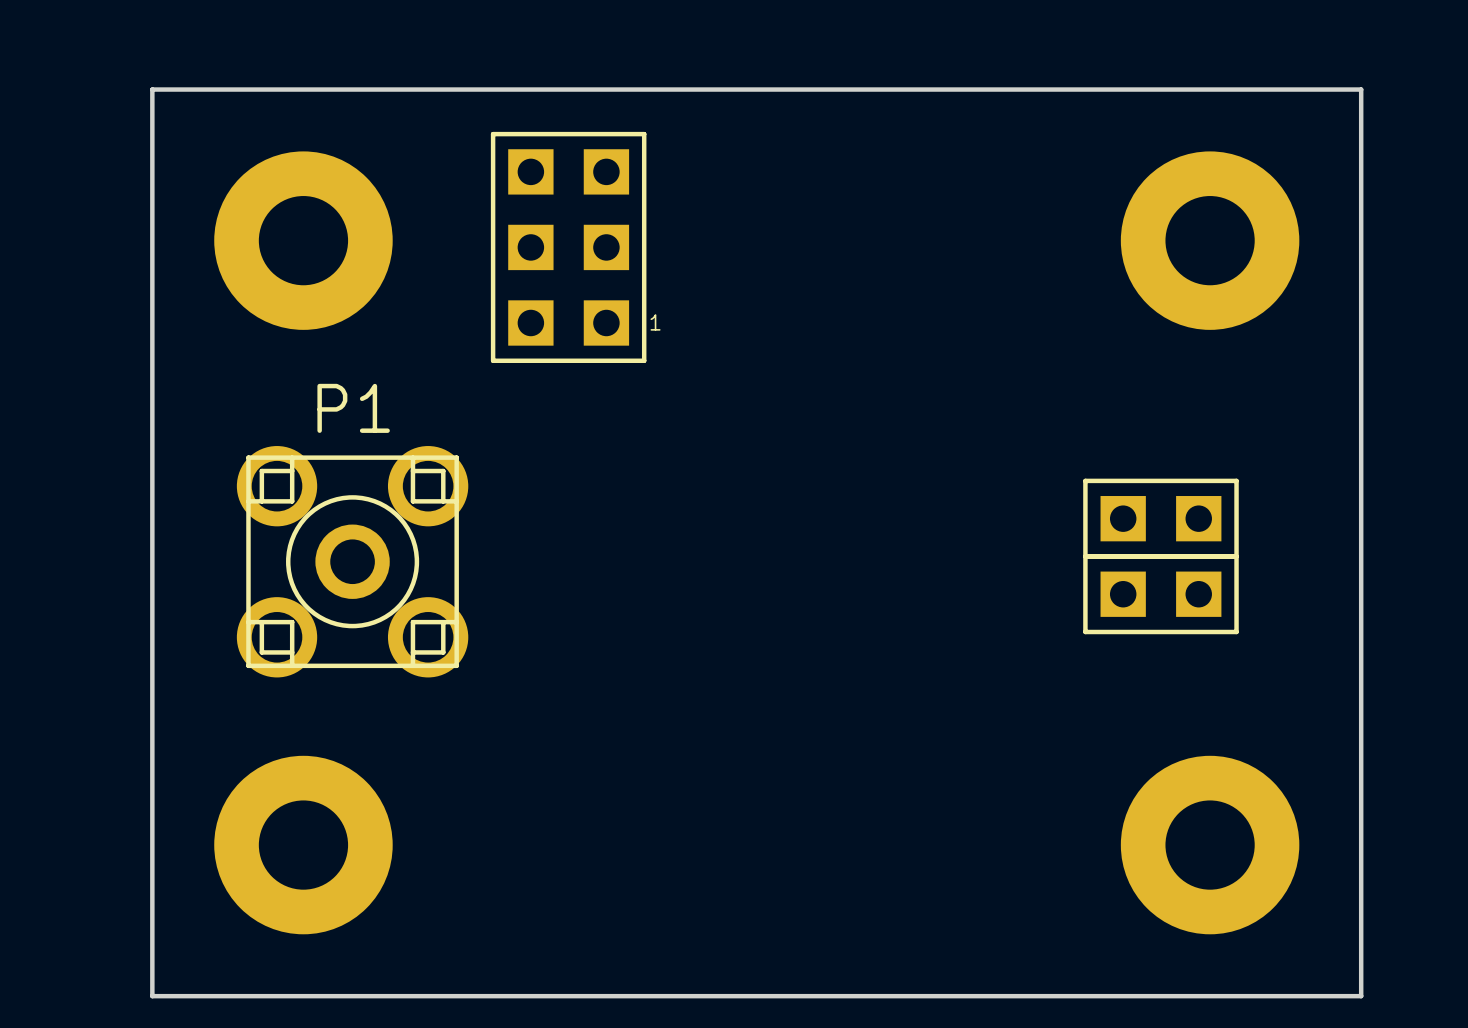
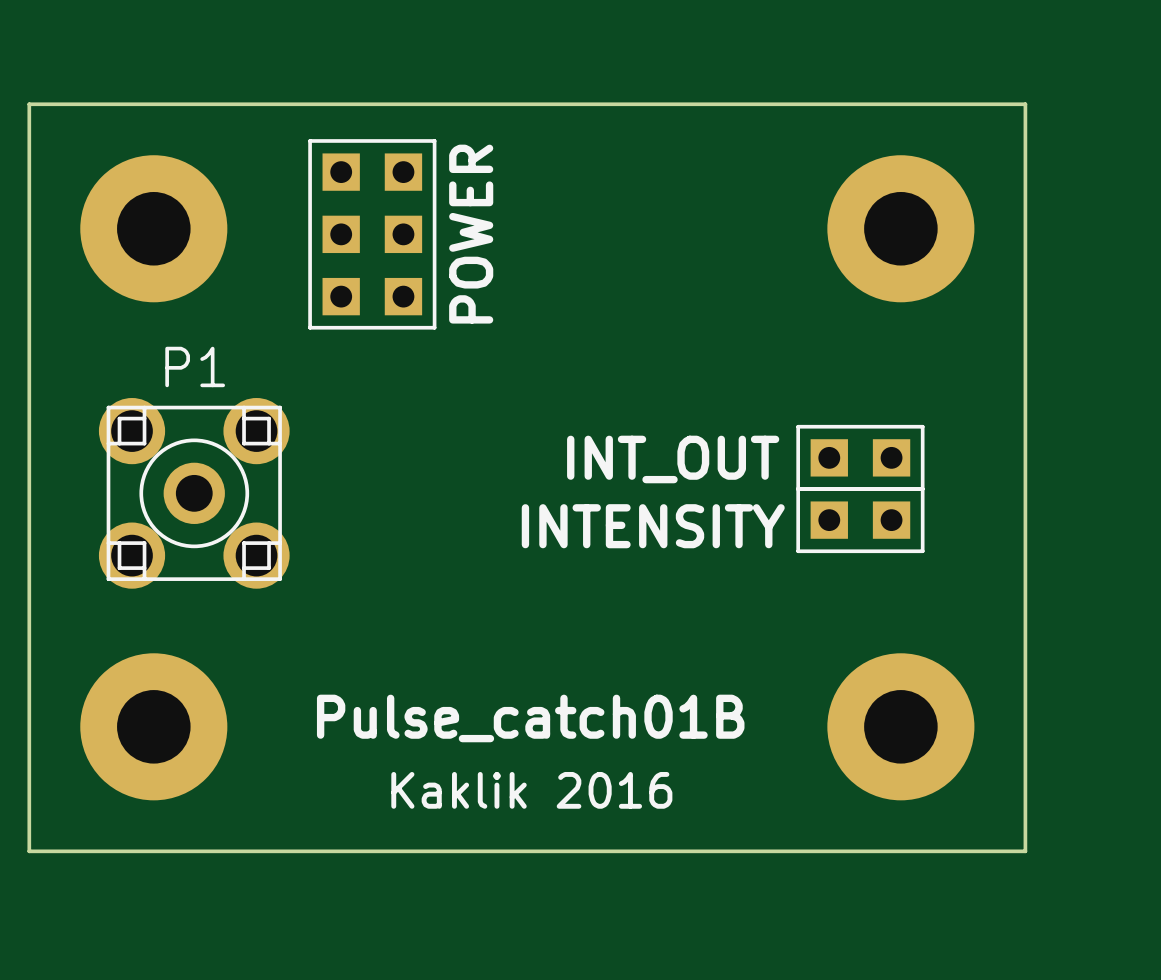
text: none -> POWER (471, 234)
part text: 1 (655, 322) -> none
text: none -> INT_OUT (673, 459)
text: none -> INTENSITY (653, 526)
text: none -> Pulse_catch01B (530, 718)
text: none -> Kaklik 2016 (531, 790)

